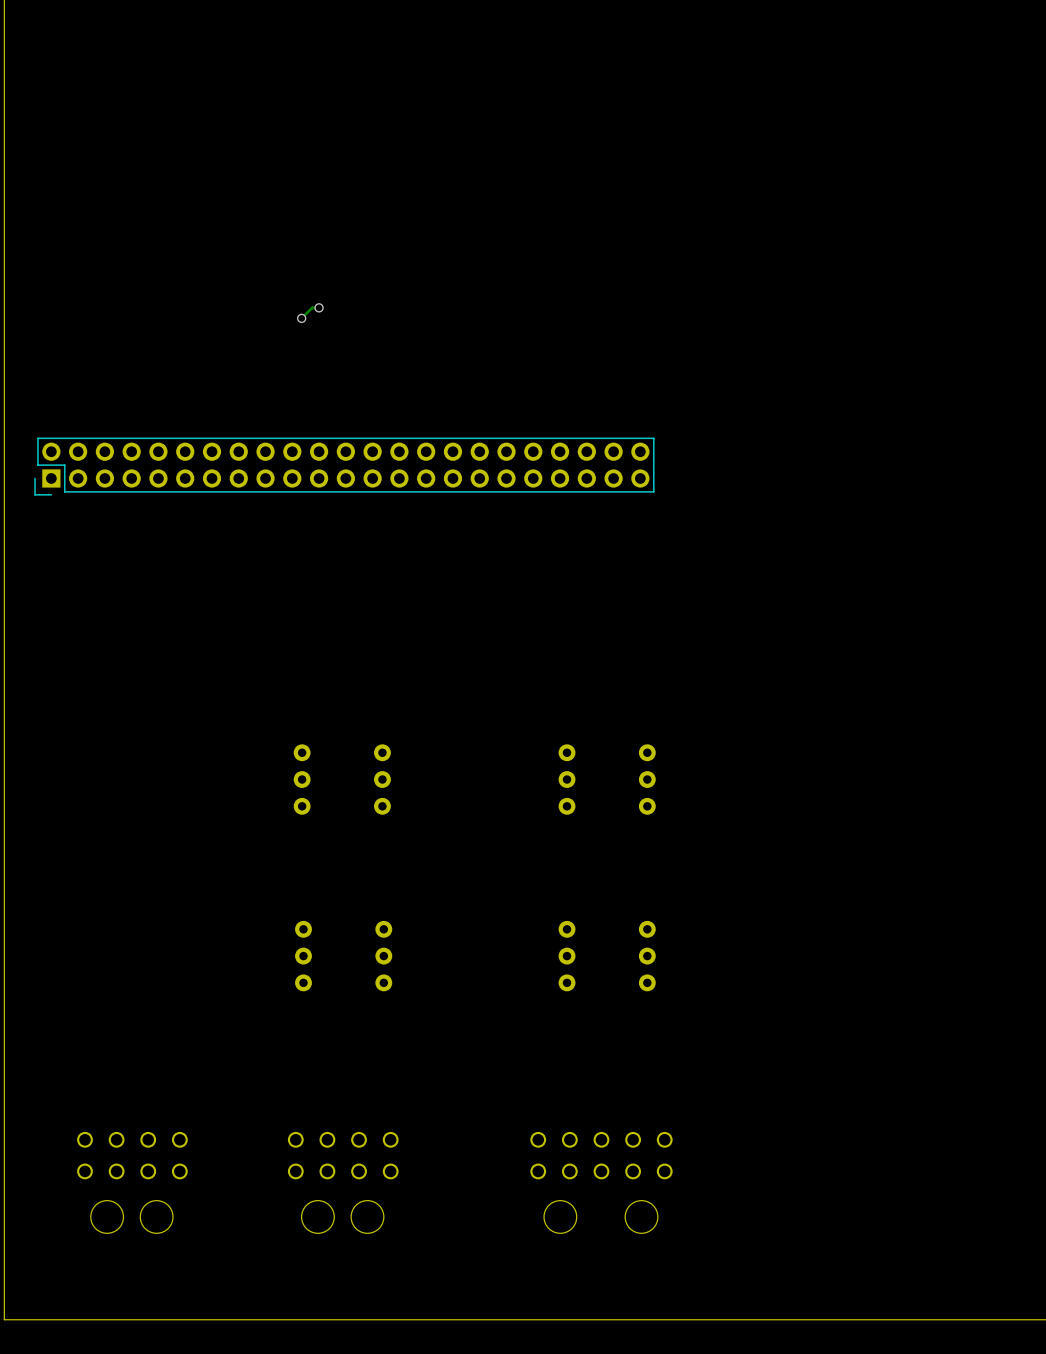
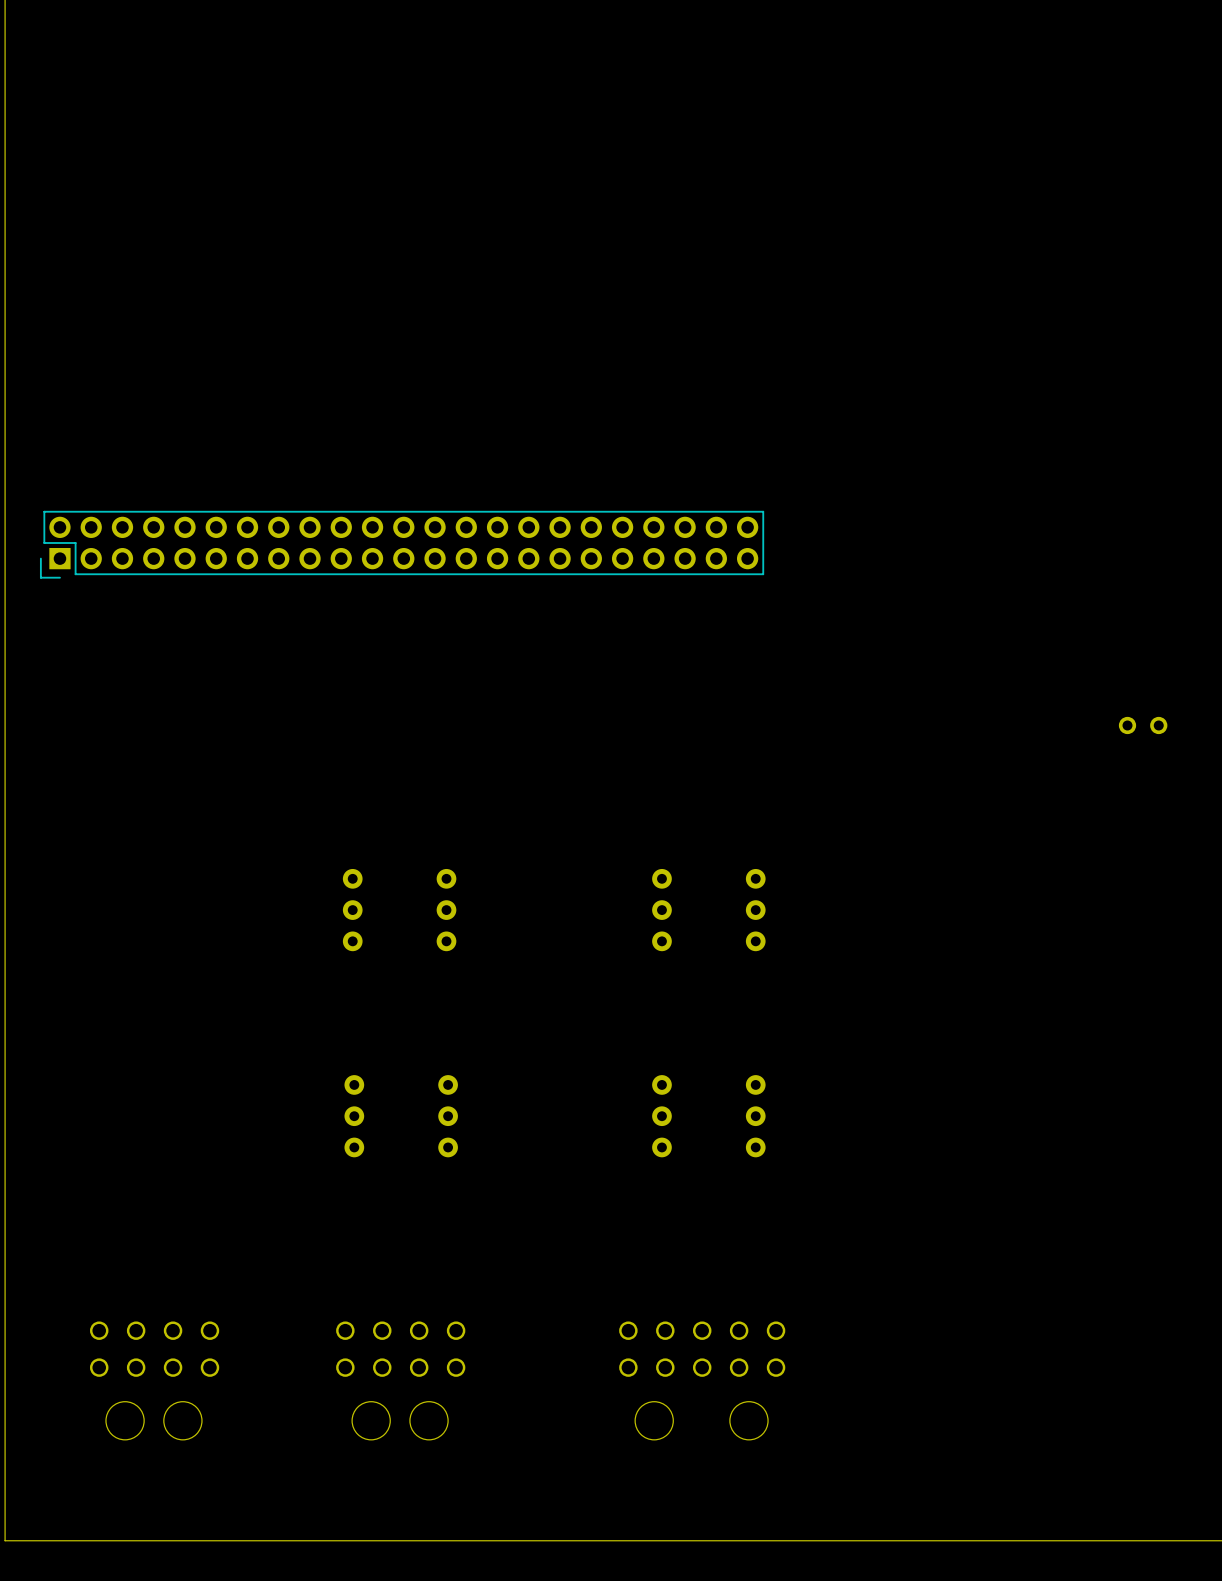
track: (319, 307) (312, 307) (301, 318) -> none
via: (319, 307) -> none
via: (301, 318) -> none
part: none -> (1143, 725)

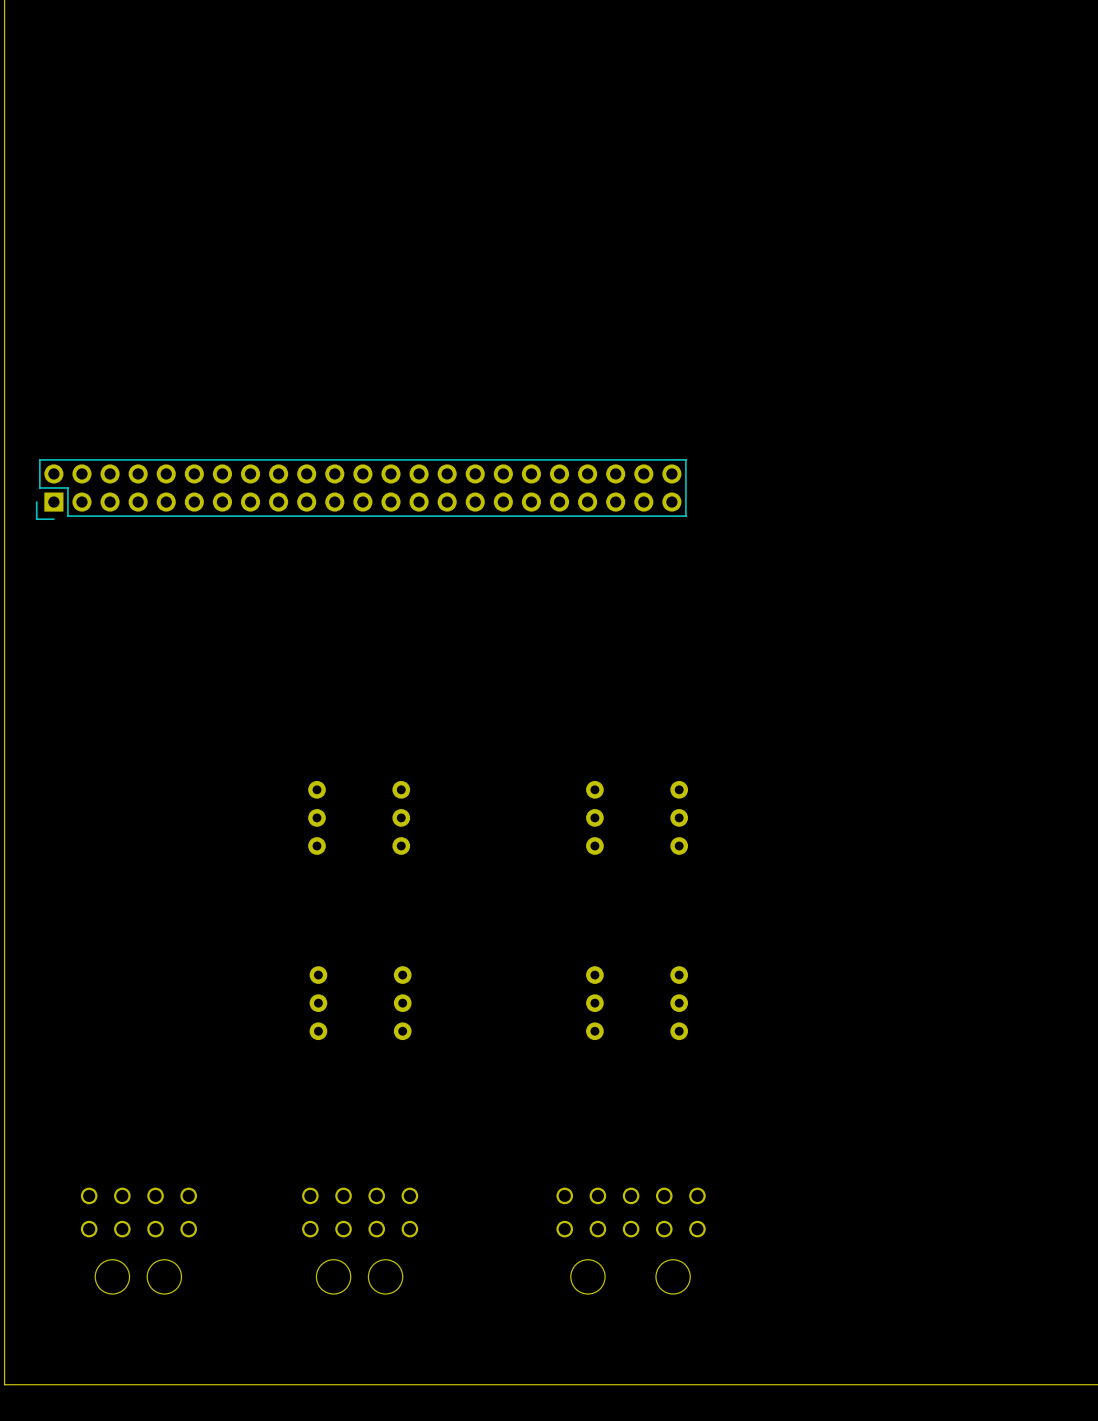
part: (1143, 725) -> none

